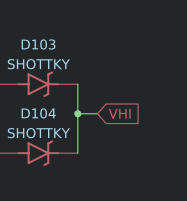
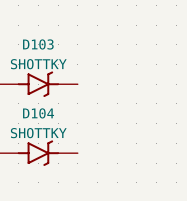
wire: (77, 84) (77, 153) -> none
wire: (77, 113) (97, 113) -> none
junction: (77, 113) -> none
global label: VHI (119, 113) -> none

